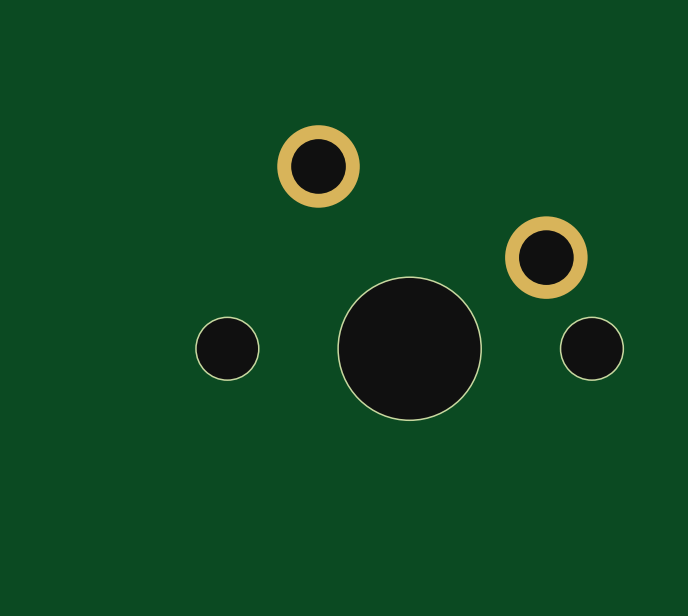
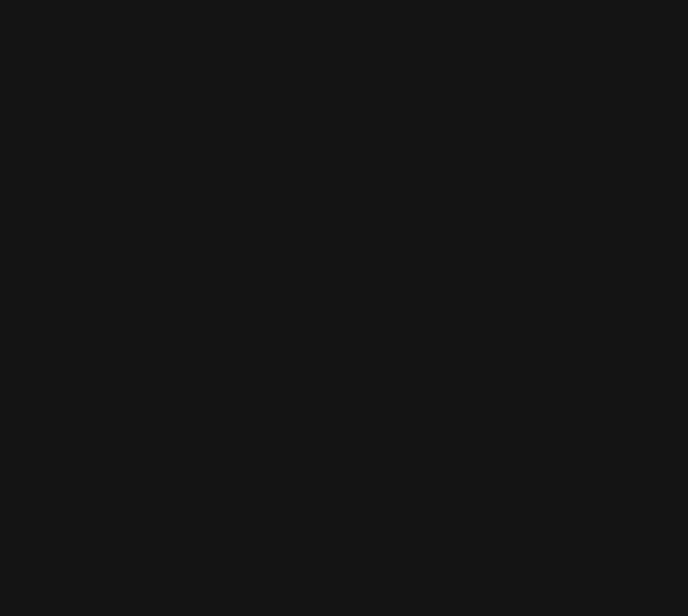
part: (409, 272) -> none

